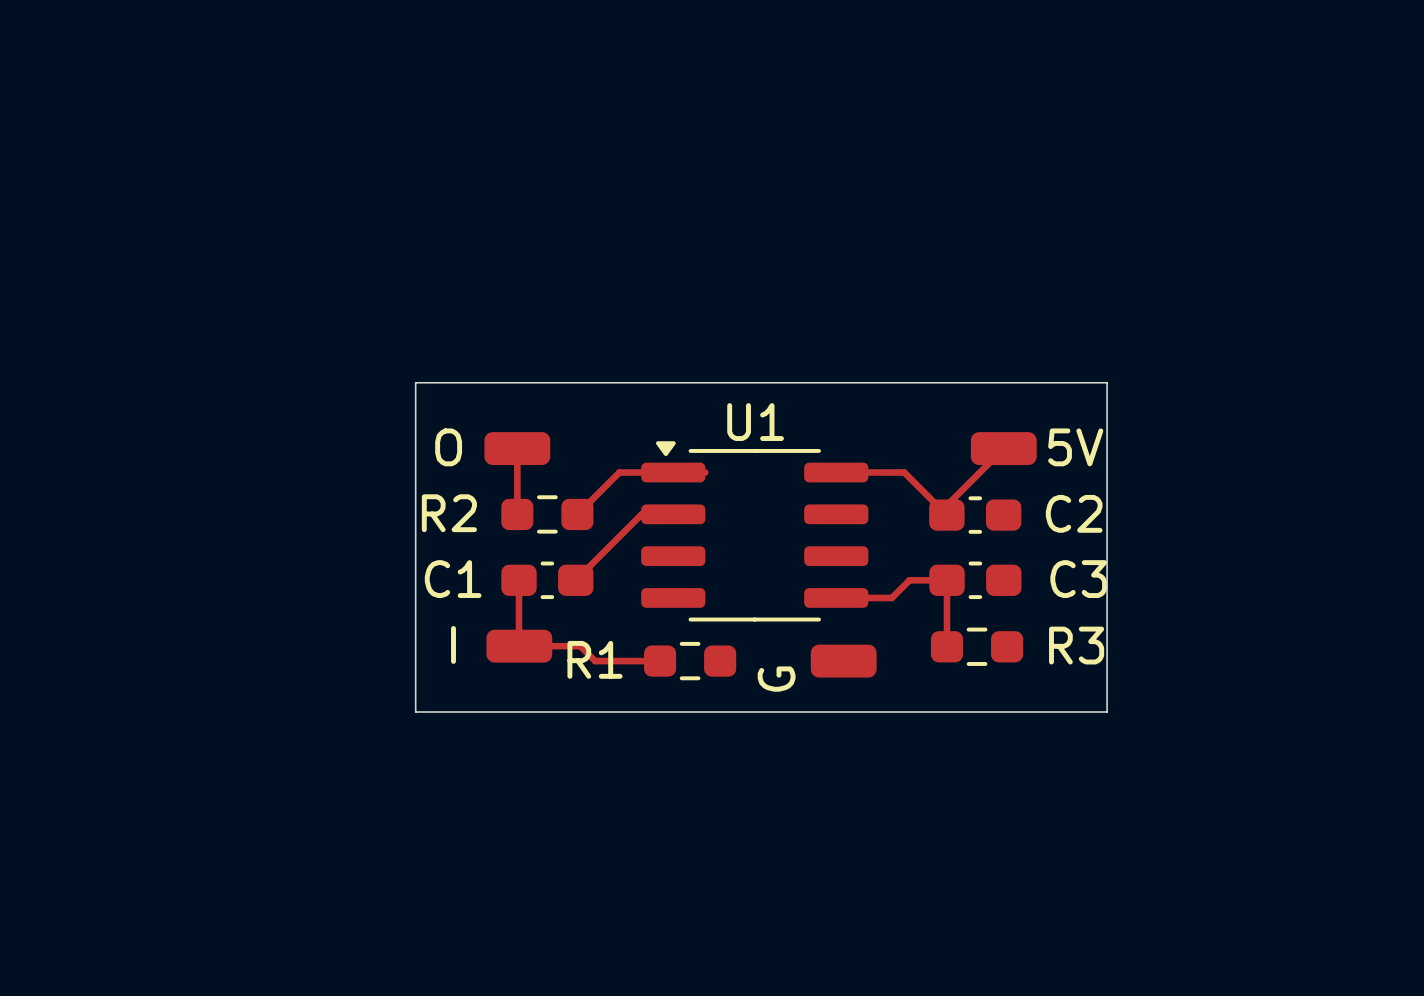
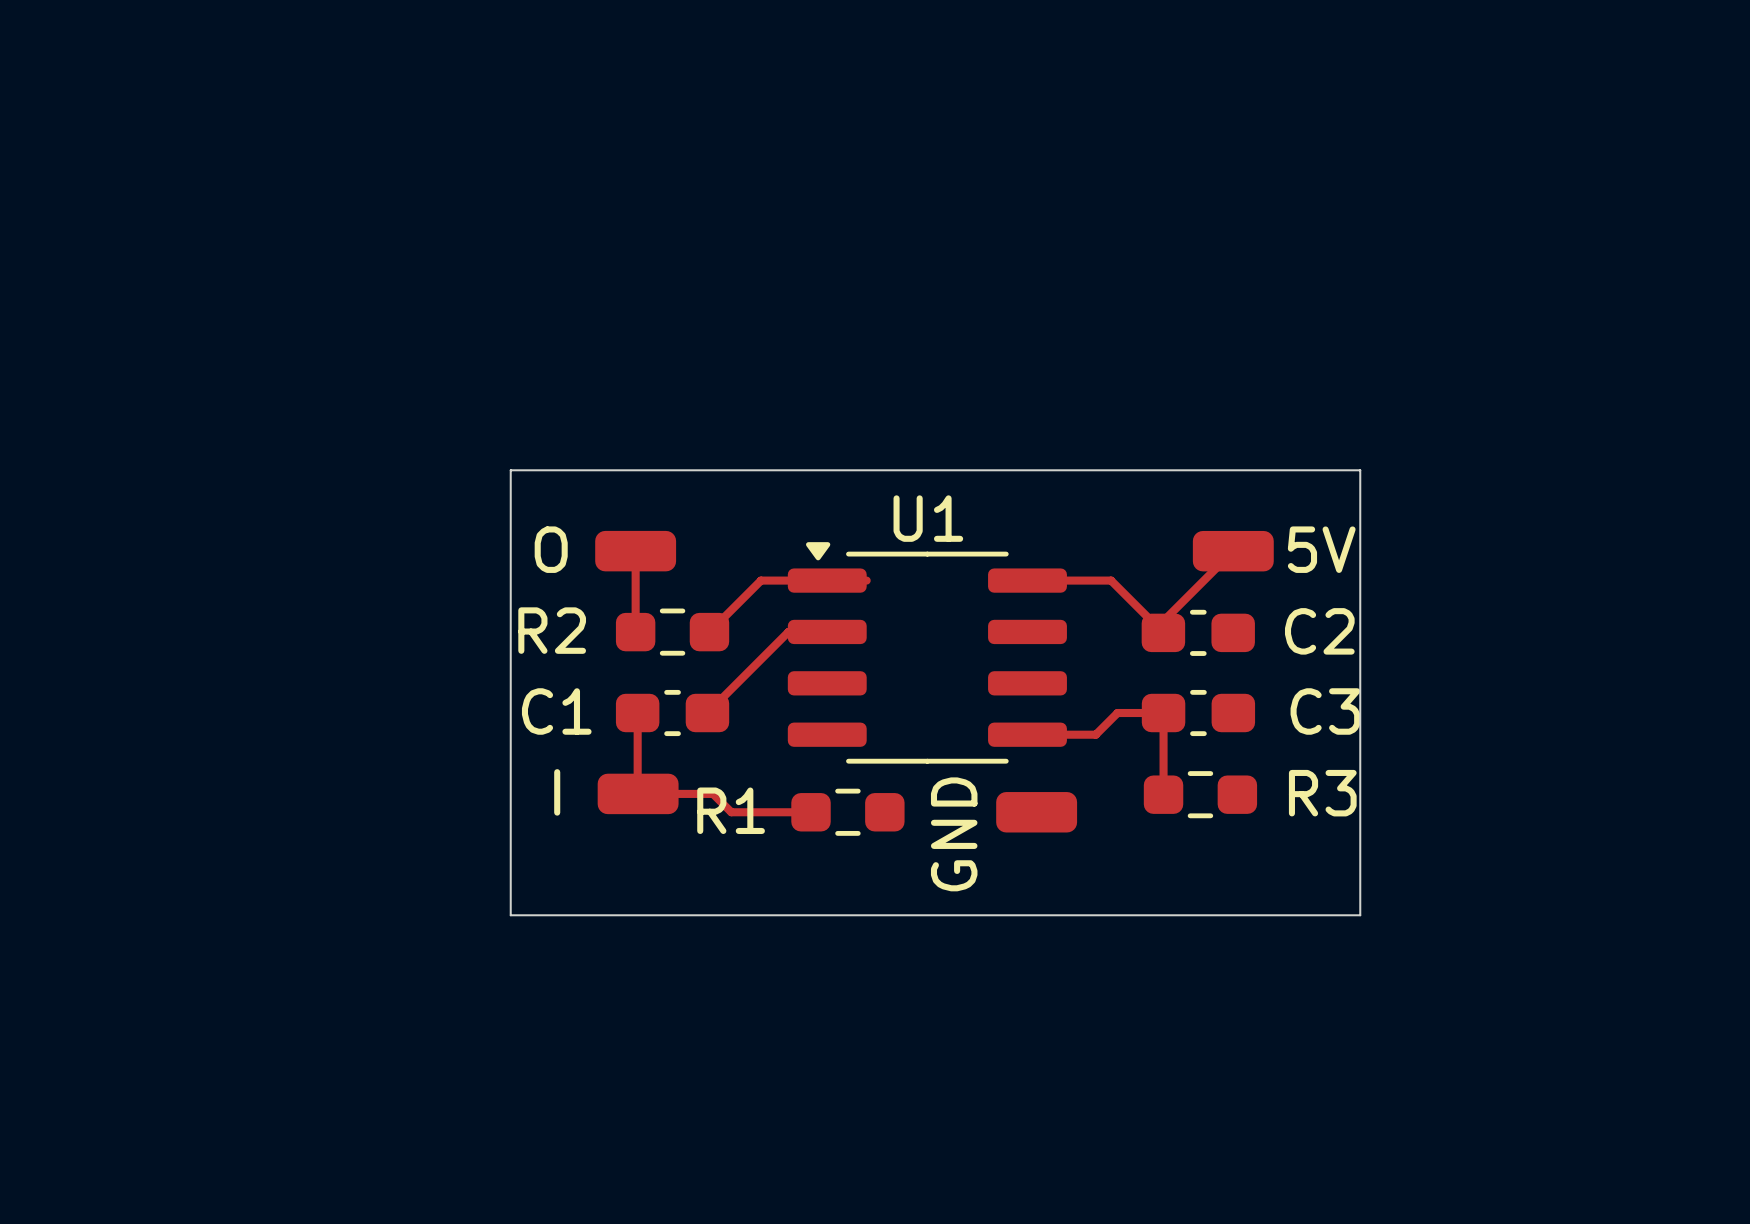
G name: G (776, 679) -> GND (954, 834)
board edge: (415, 712) (1107, 712) -> (510, 874) (510, 915) (1360, 915) (1360, 874)

